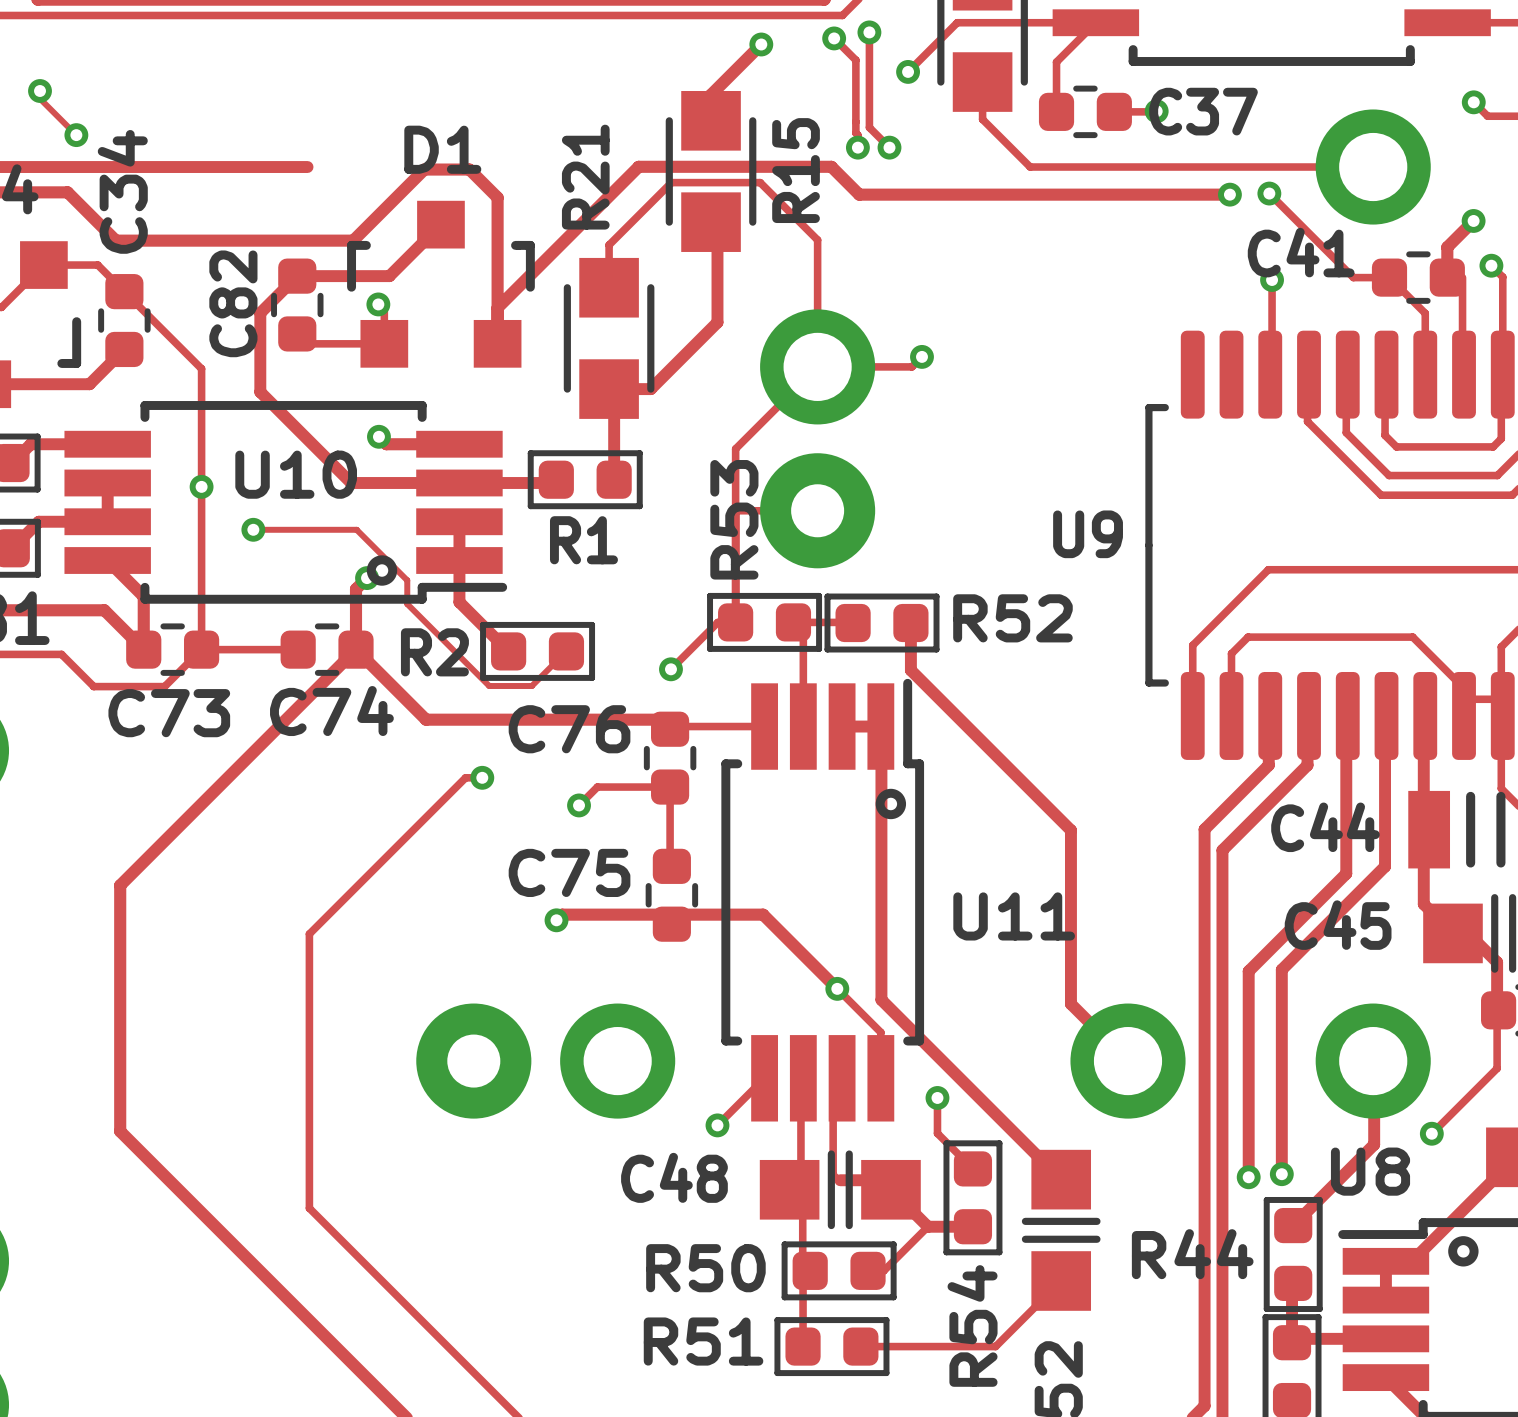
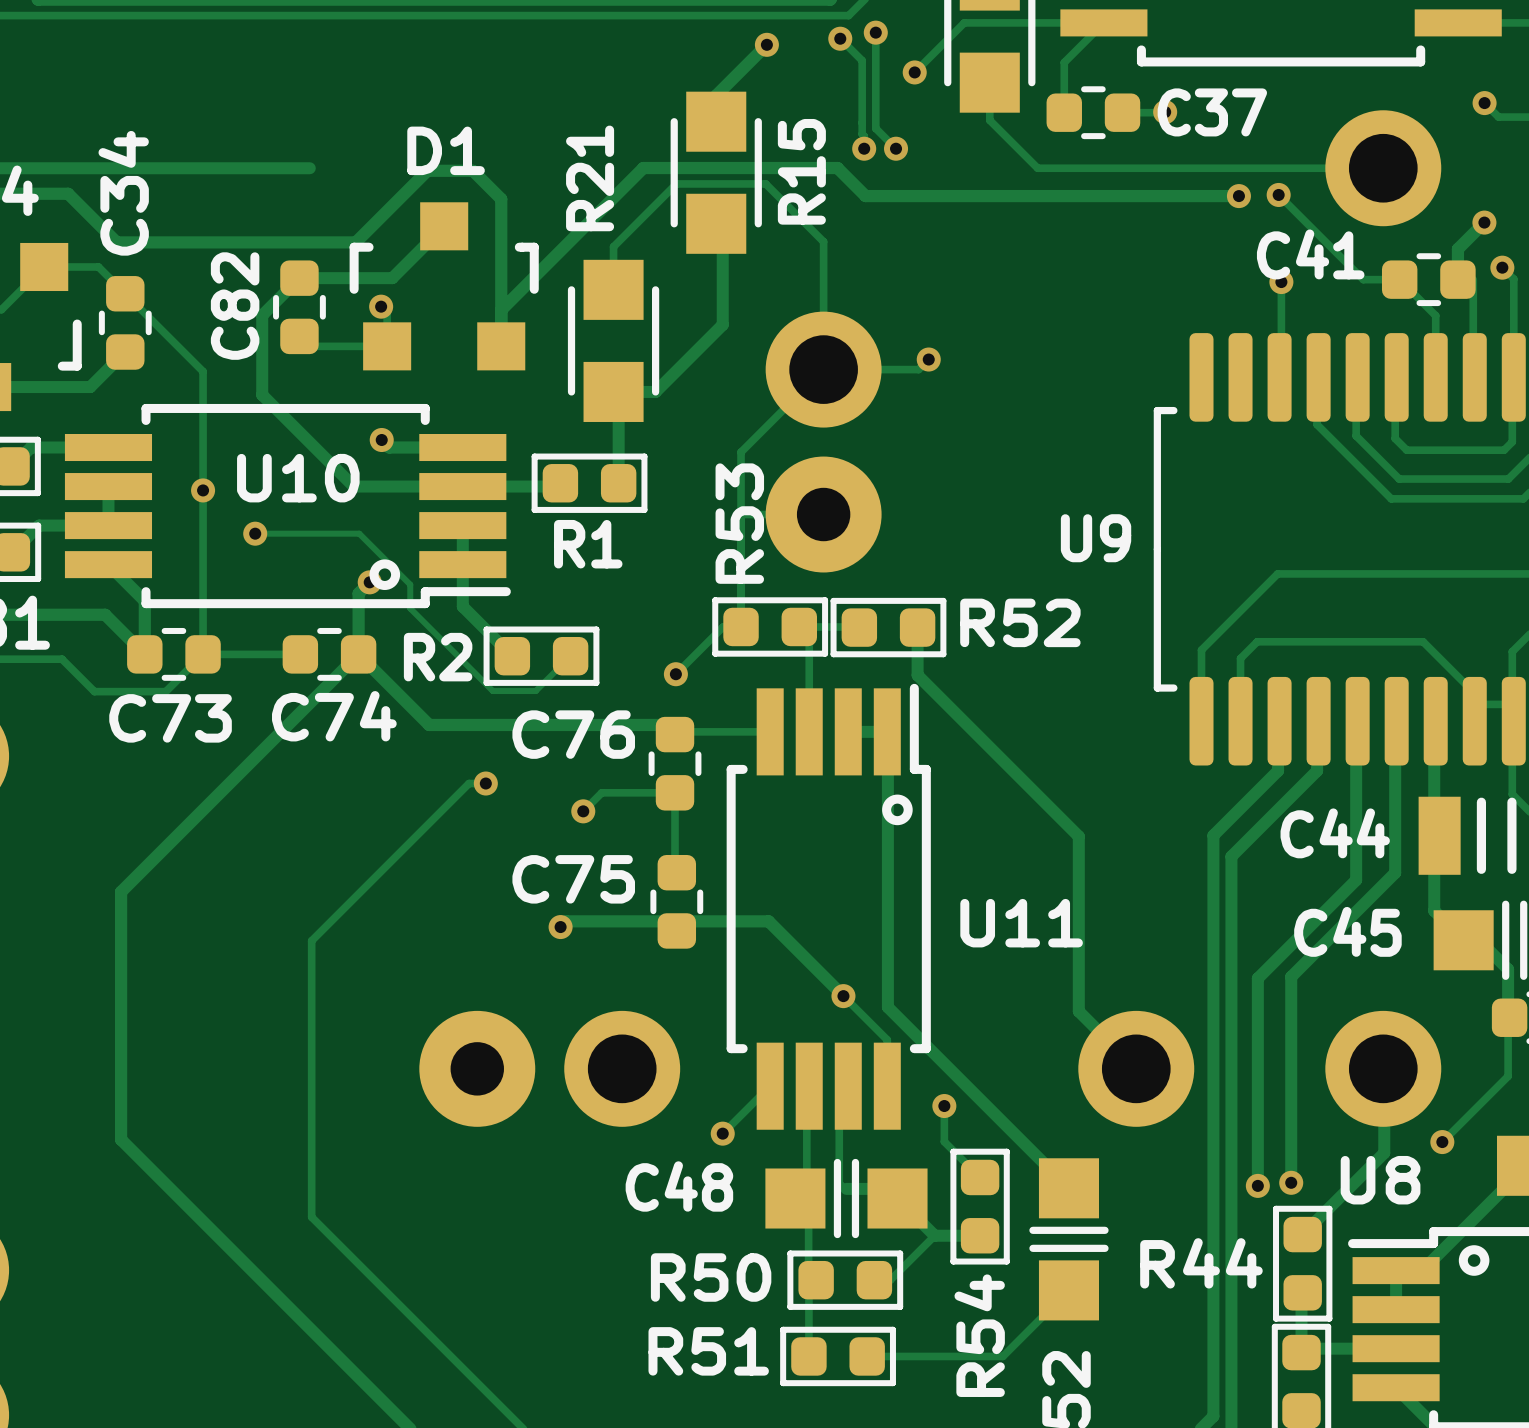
track: (40, 91) (40, 98) (76, 135) -> none
via: (40, 91) -> none
via: (76, 135) -> none

